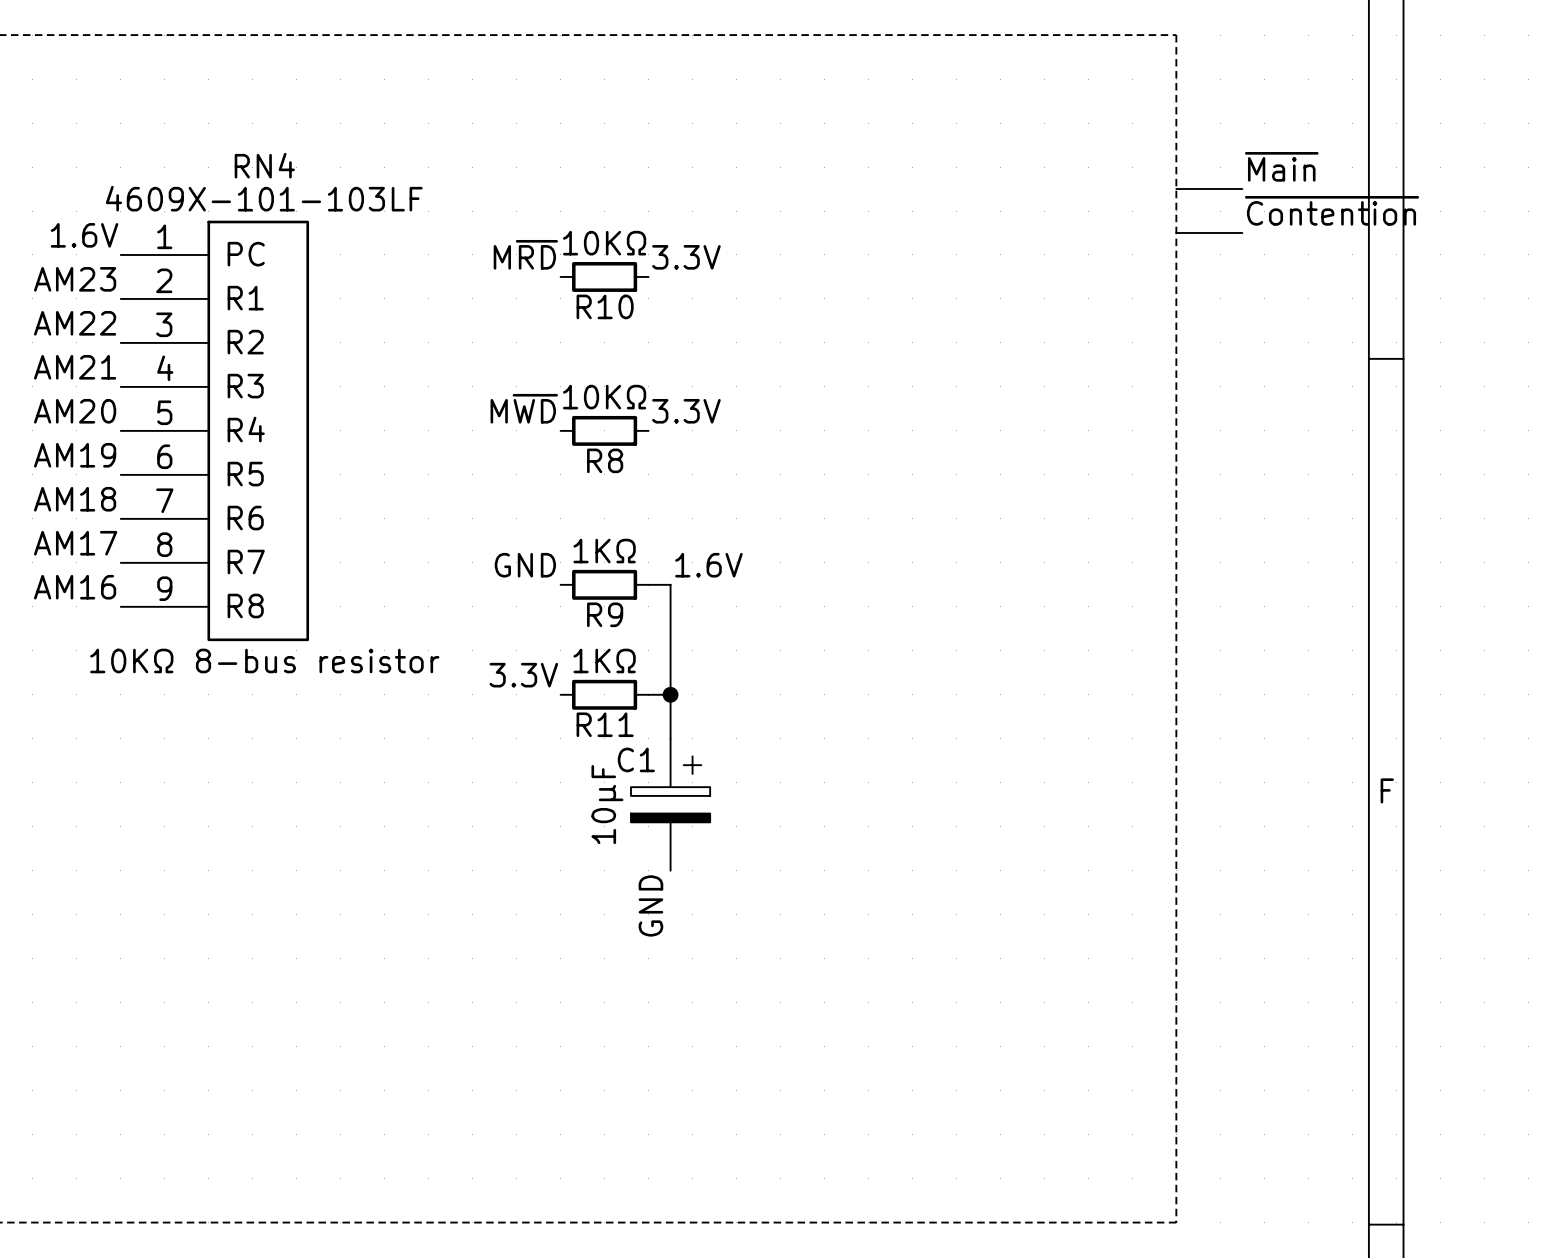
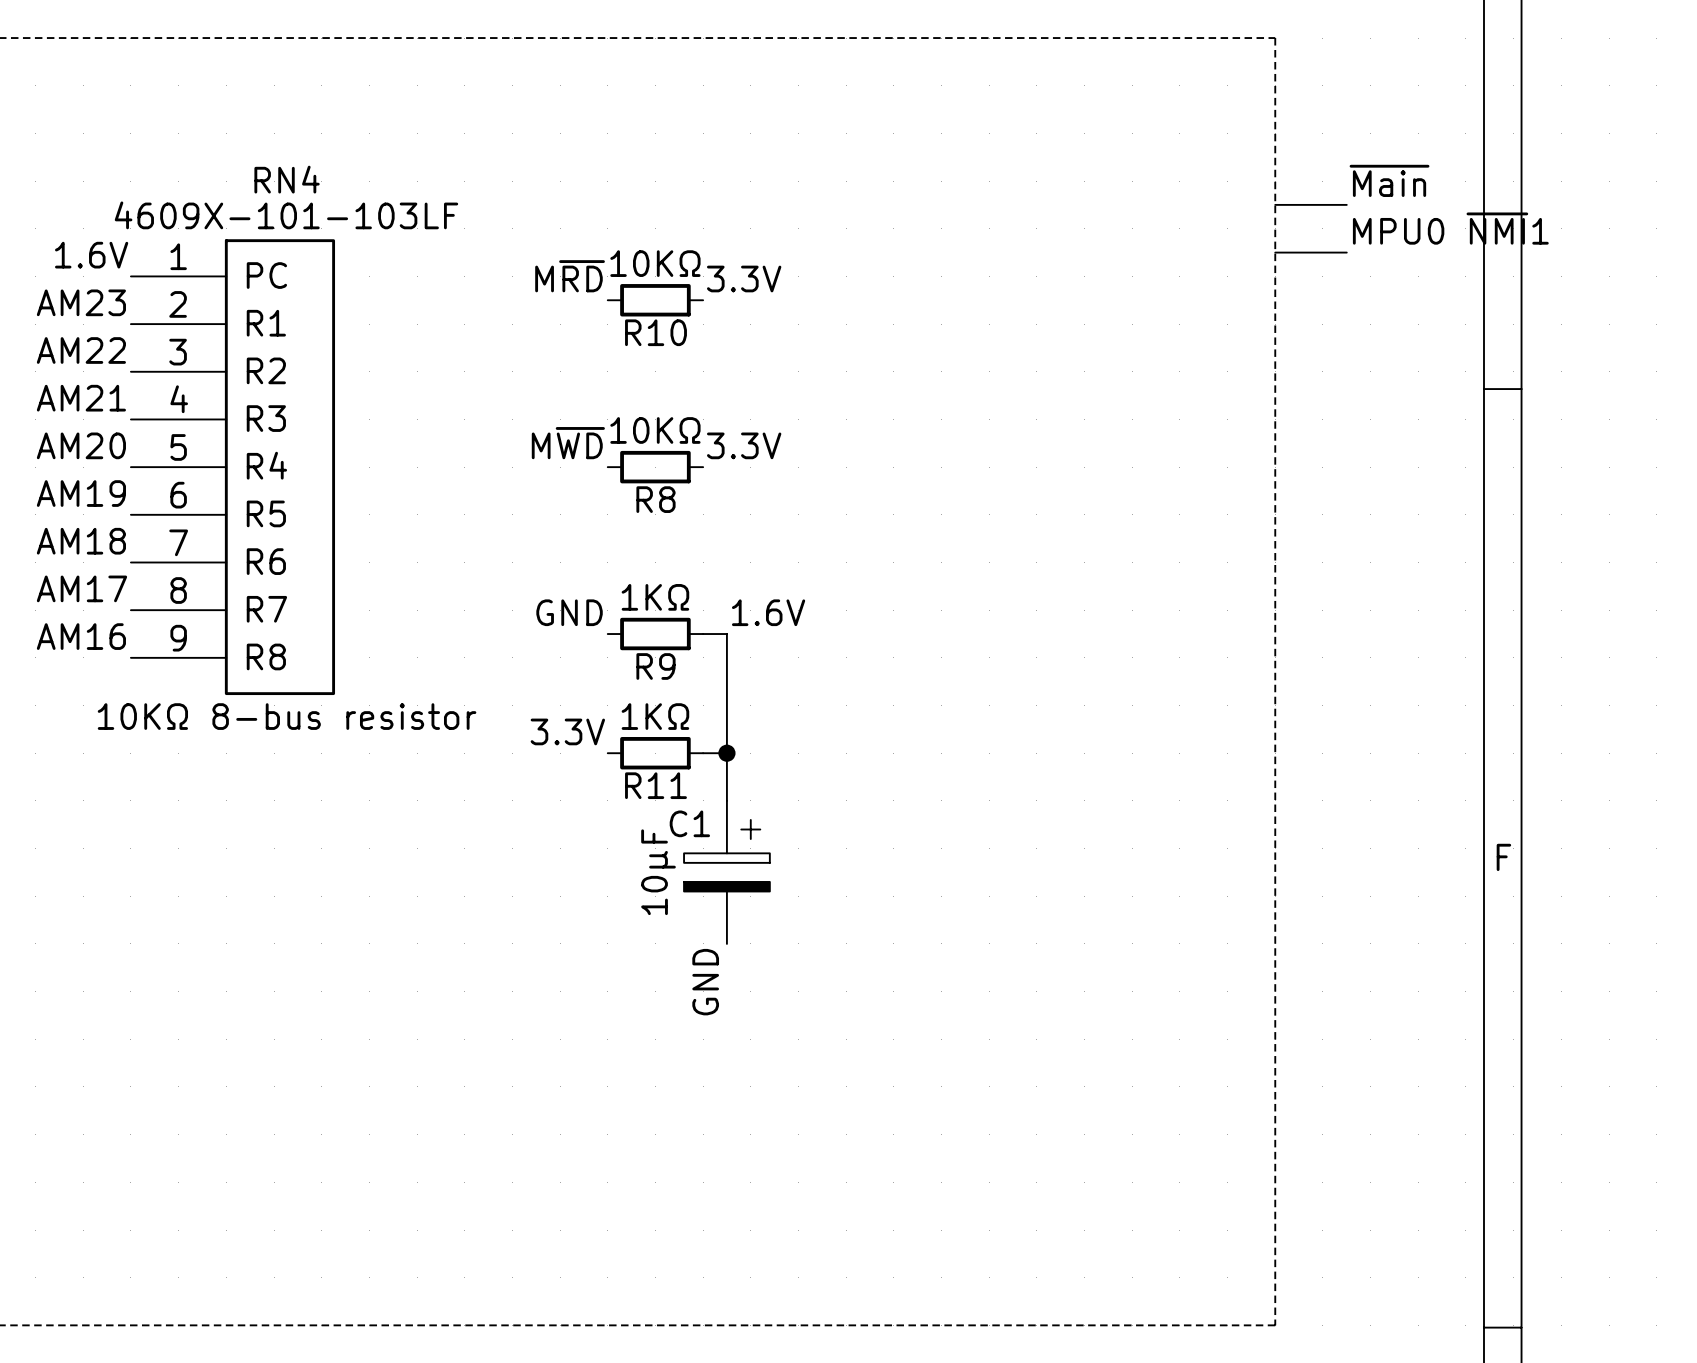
label: ~{Contention} (1332, 210) -> MPU0 ~{NMI}1 (1450, 228)

